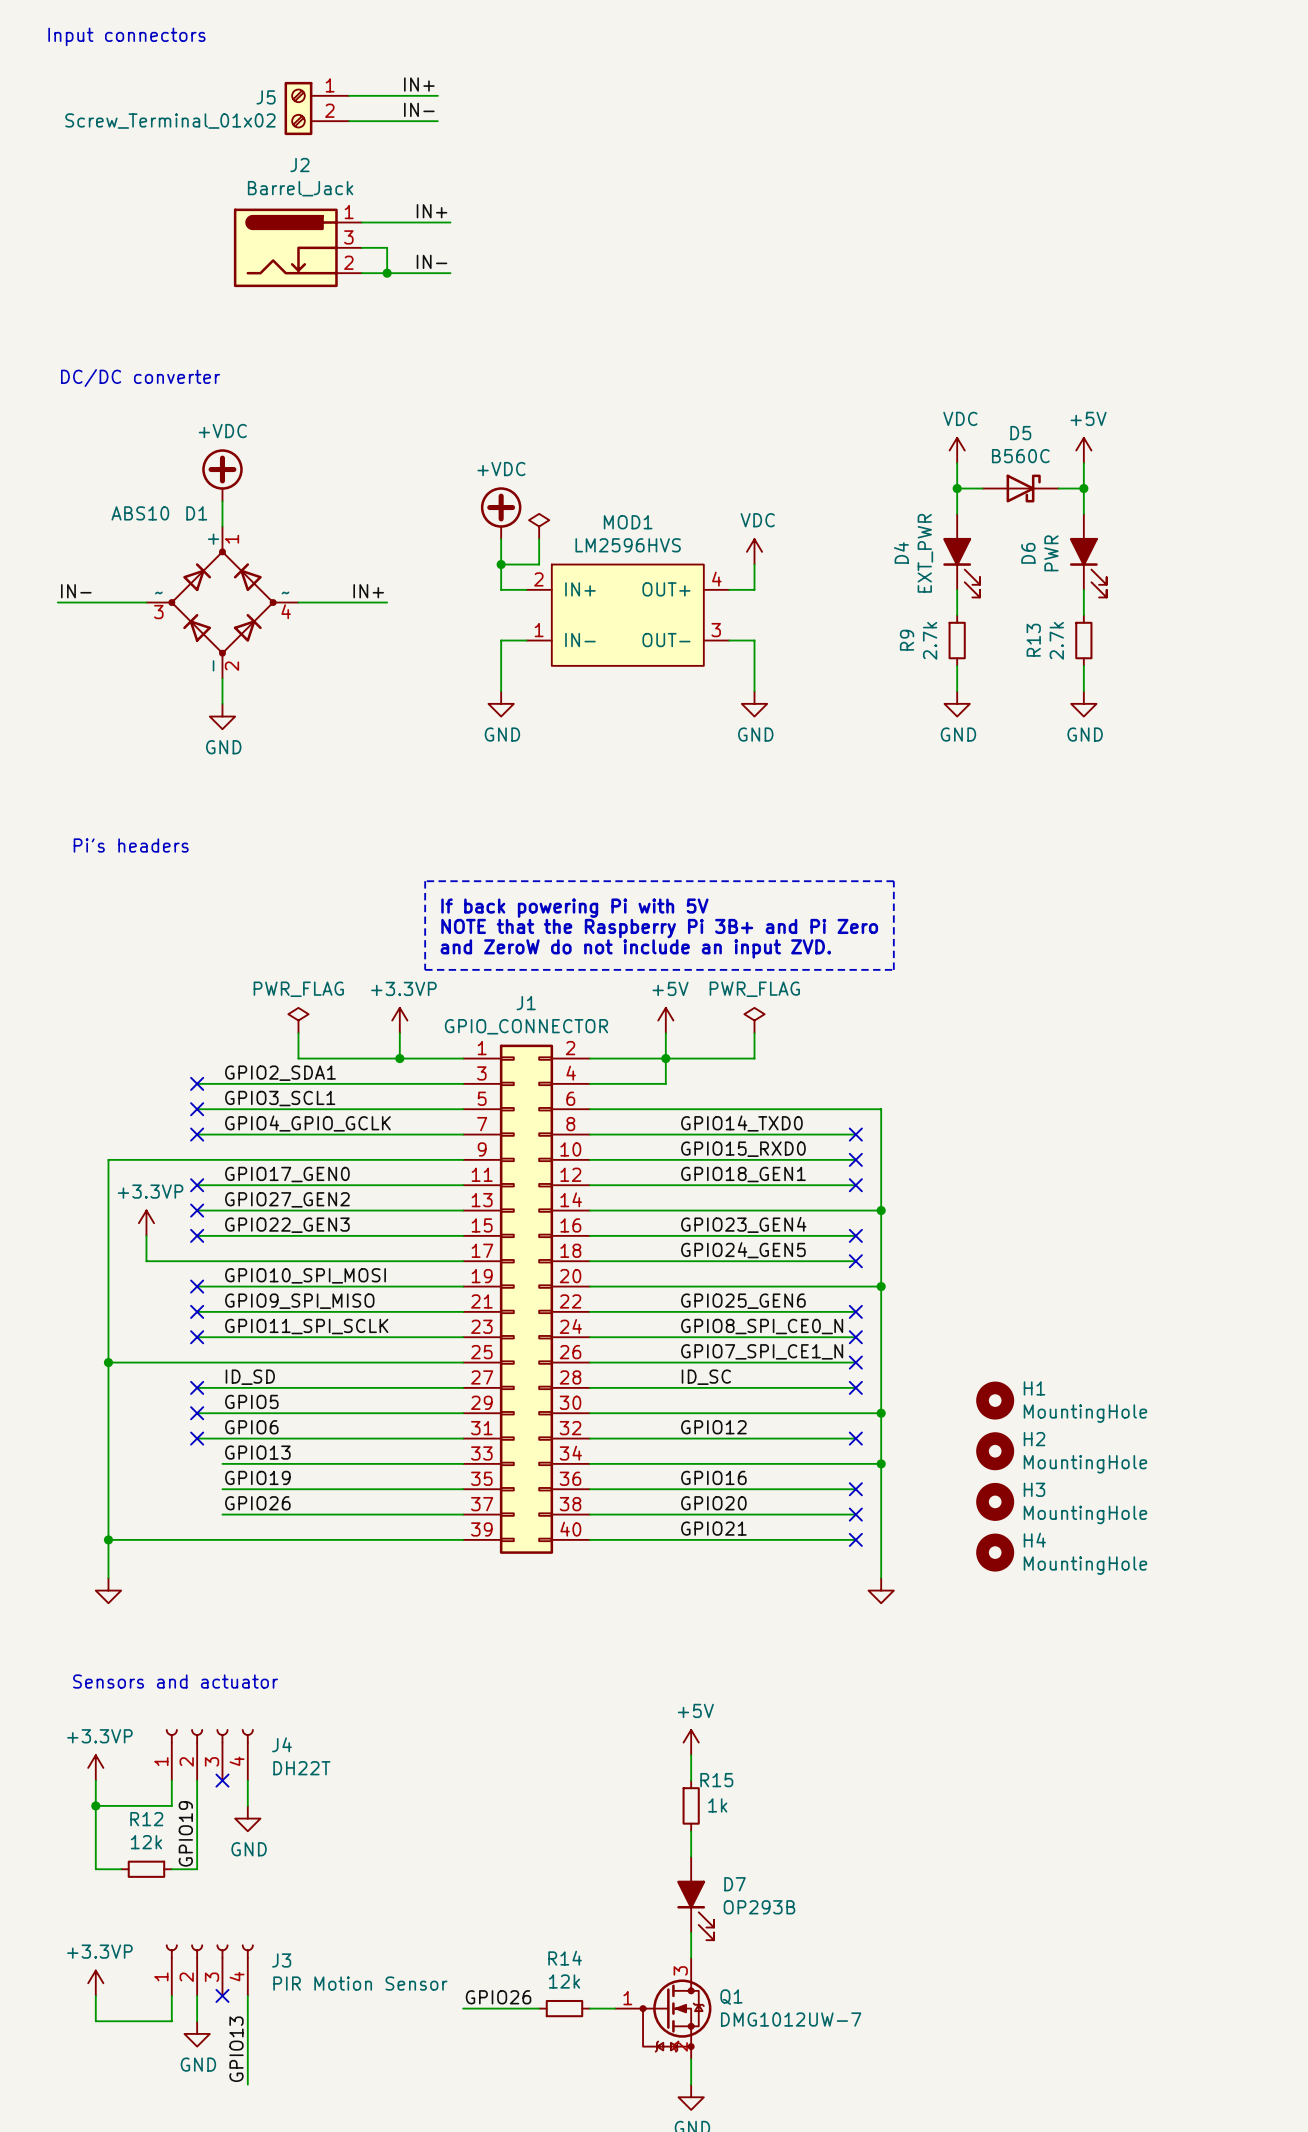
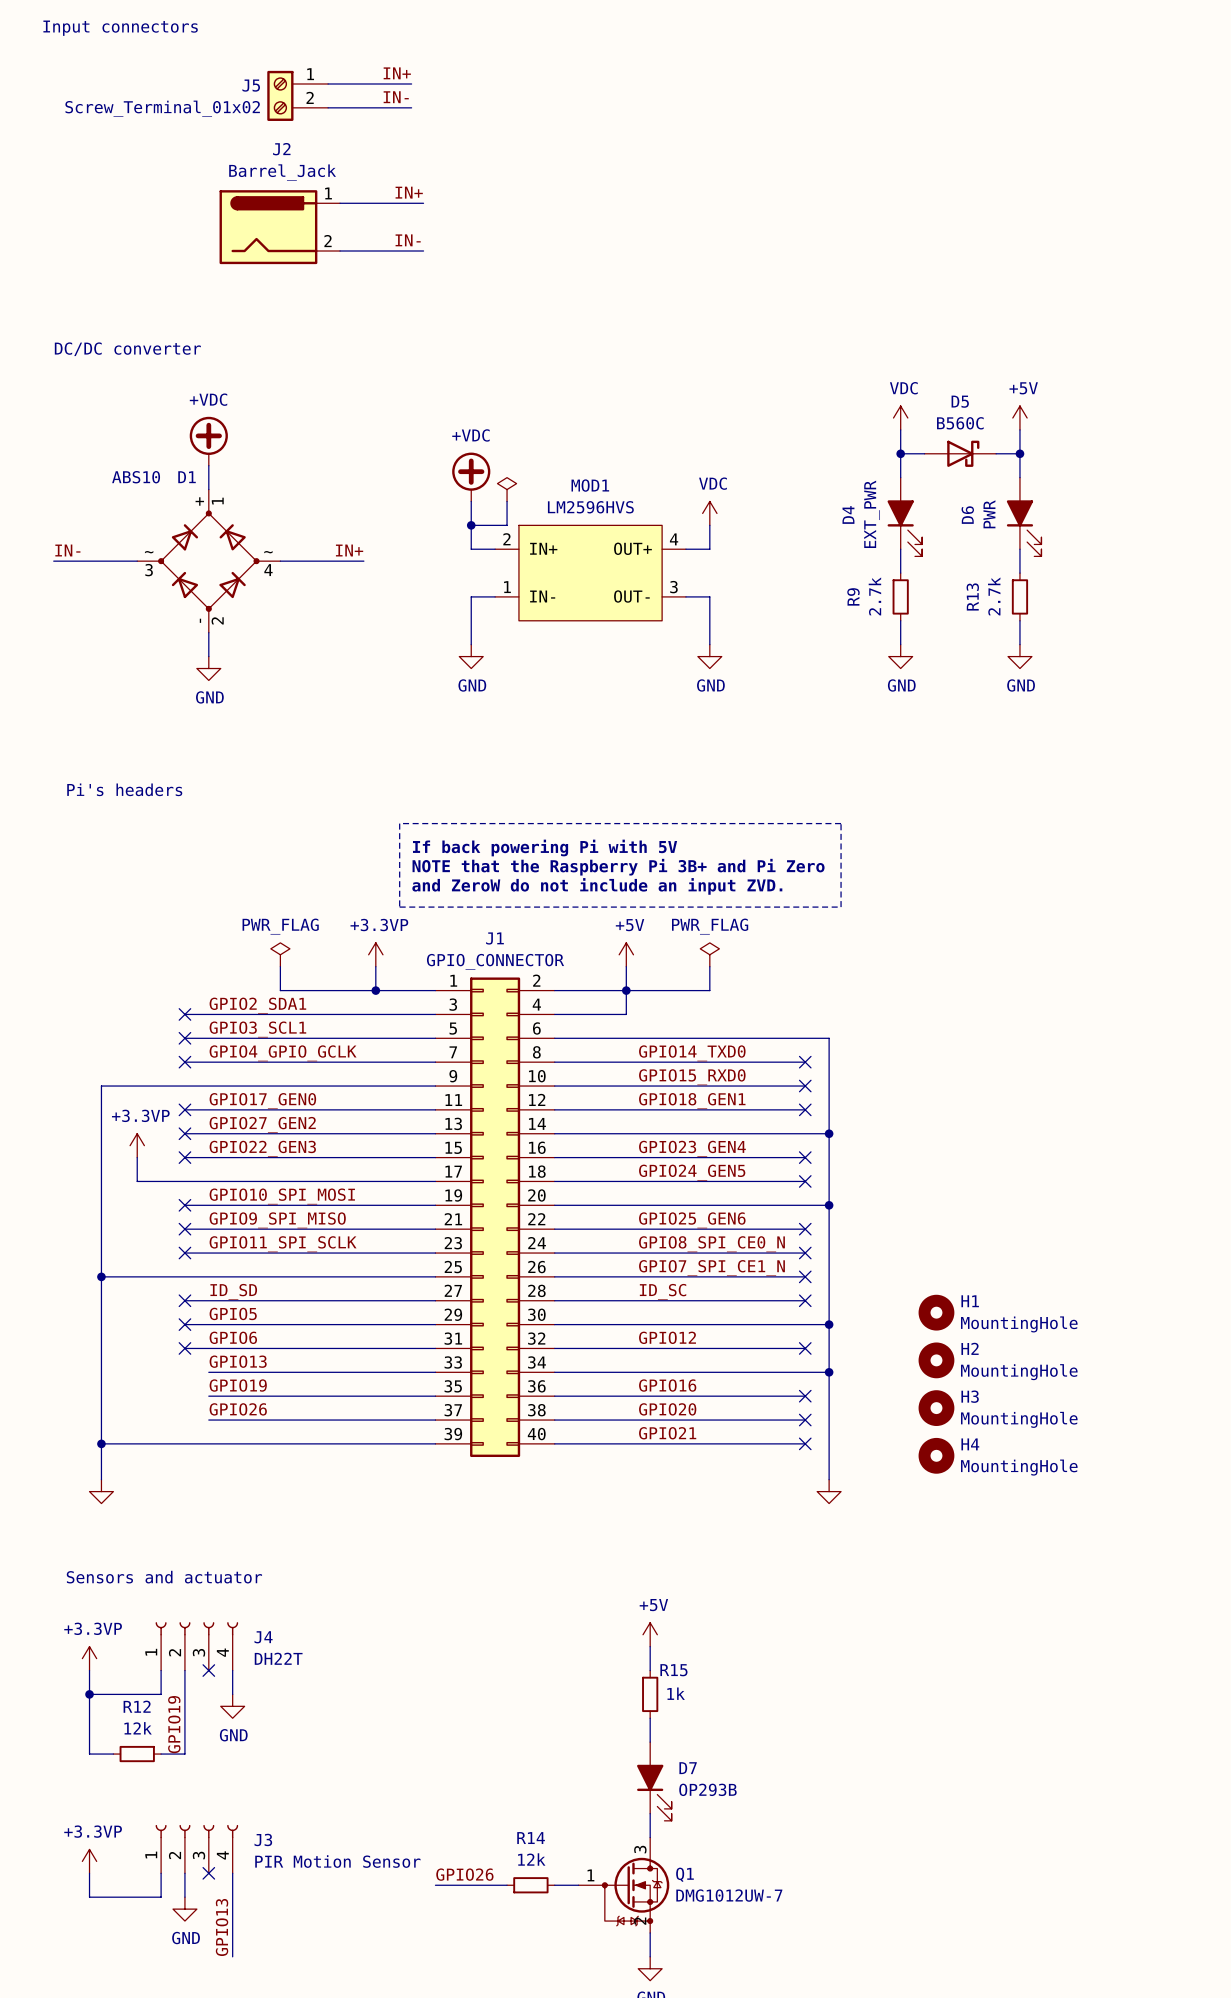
J2 symbol: [233, 208, 362, 288] -> [219, 190, 341, 265]
wire: (361, 247) (387, 247) (387, 273) -> none
junction: (387, 273) -> none

